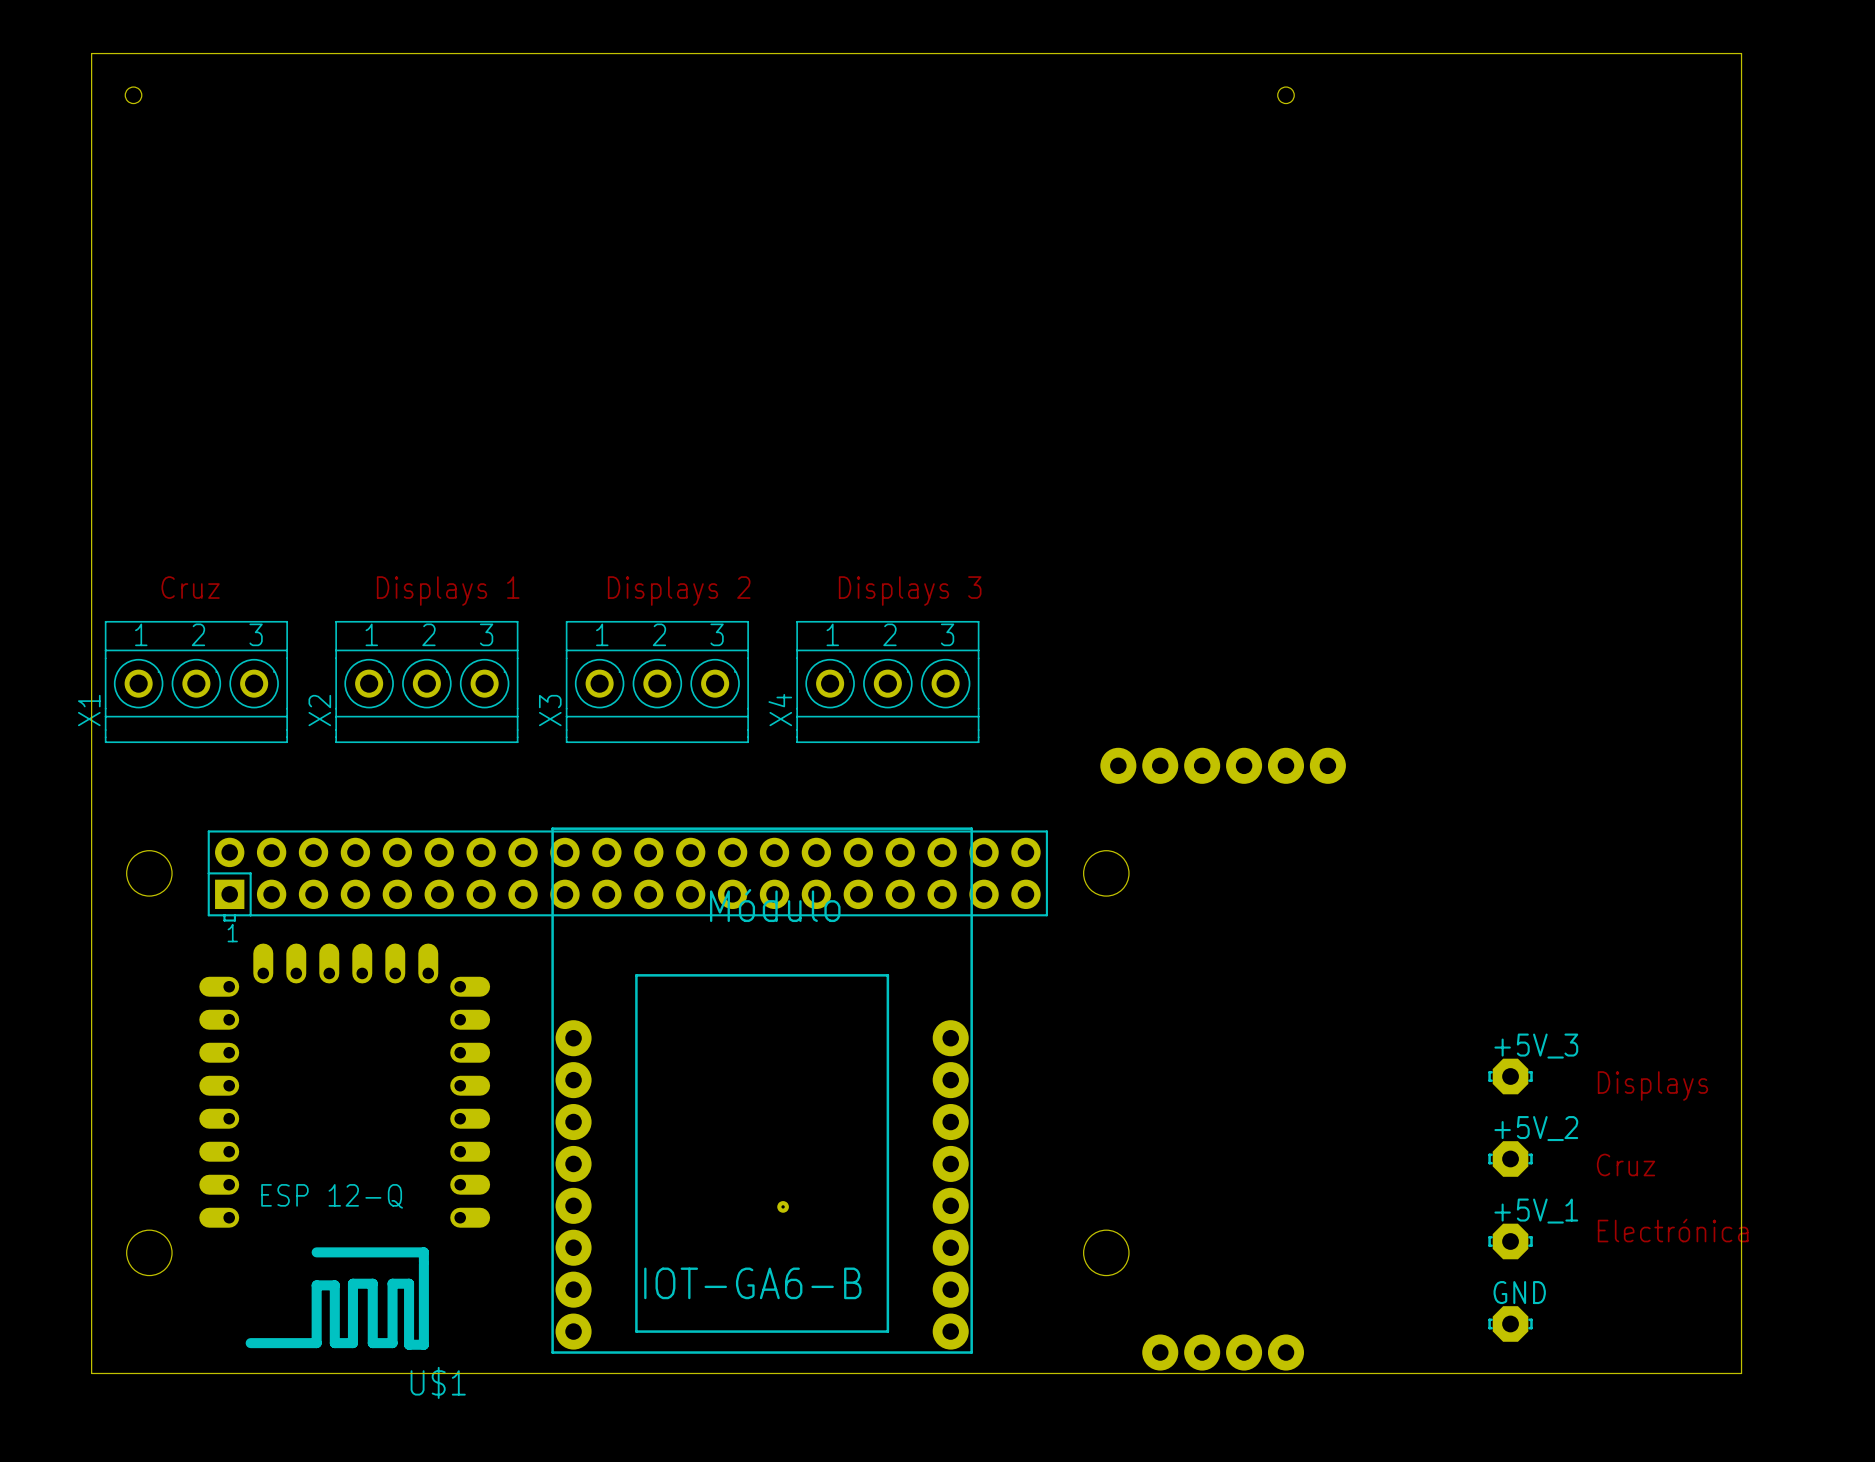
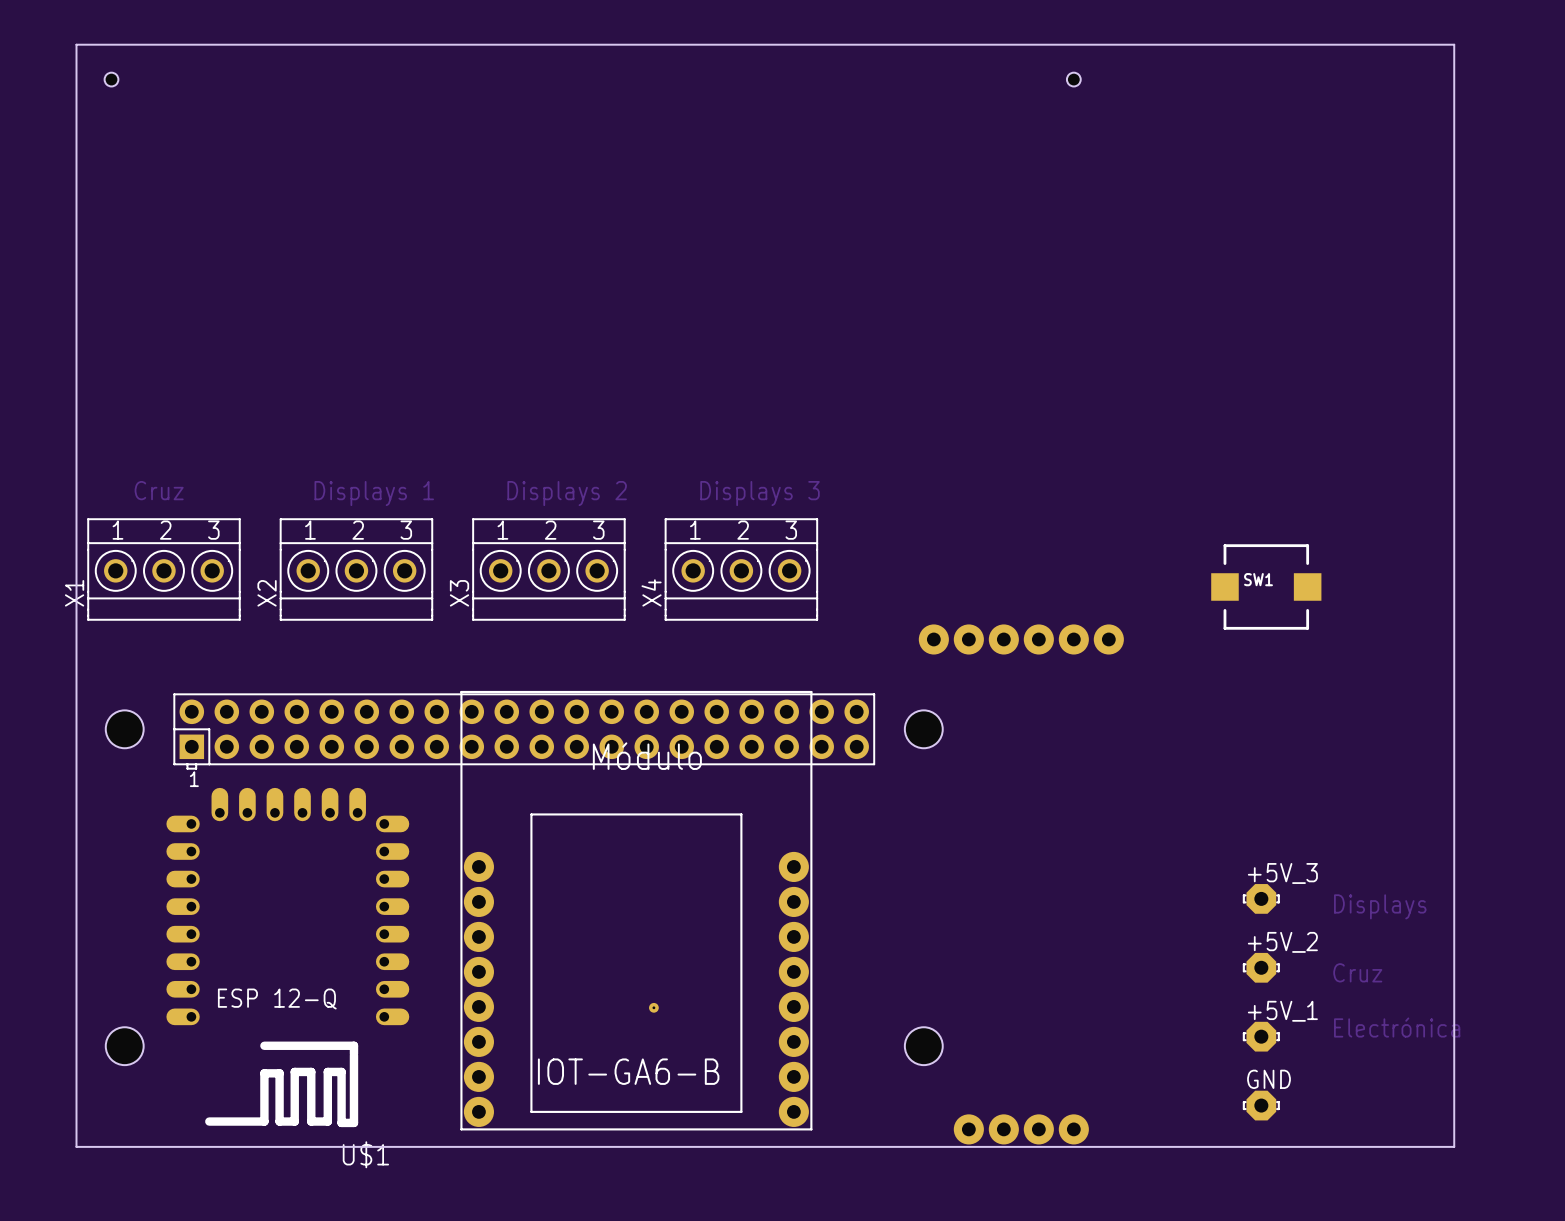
SW1: none -> (1266, 586)

